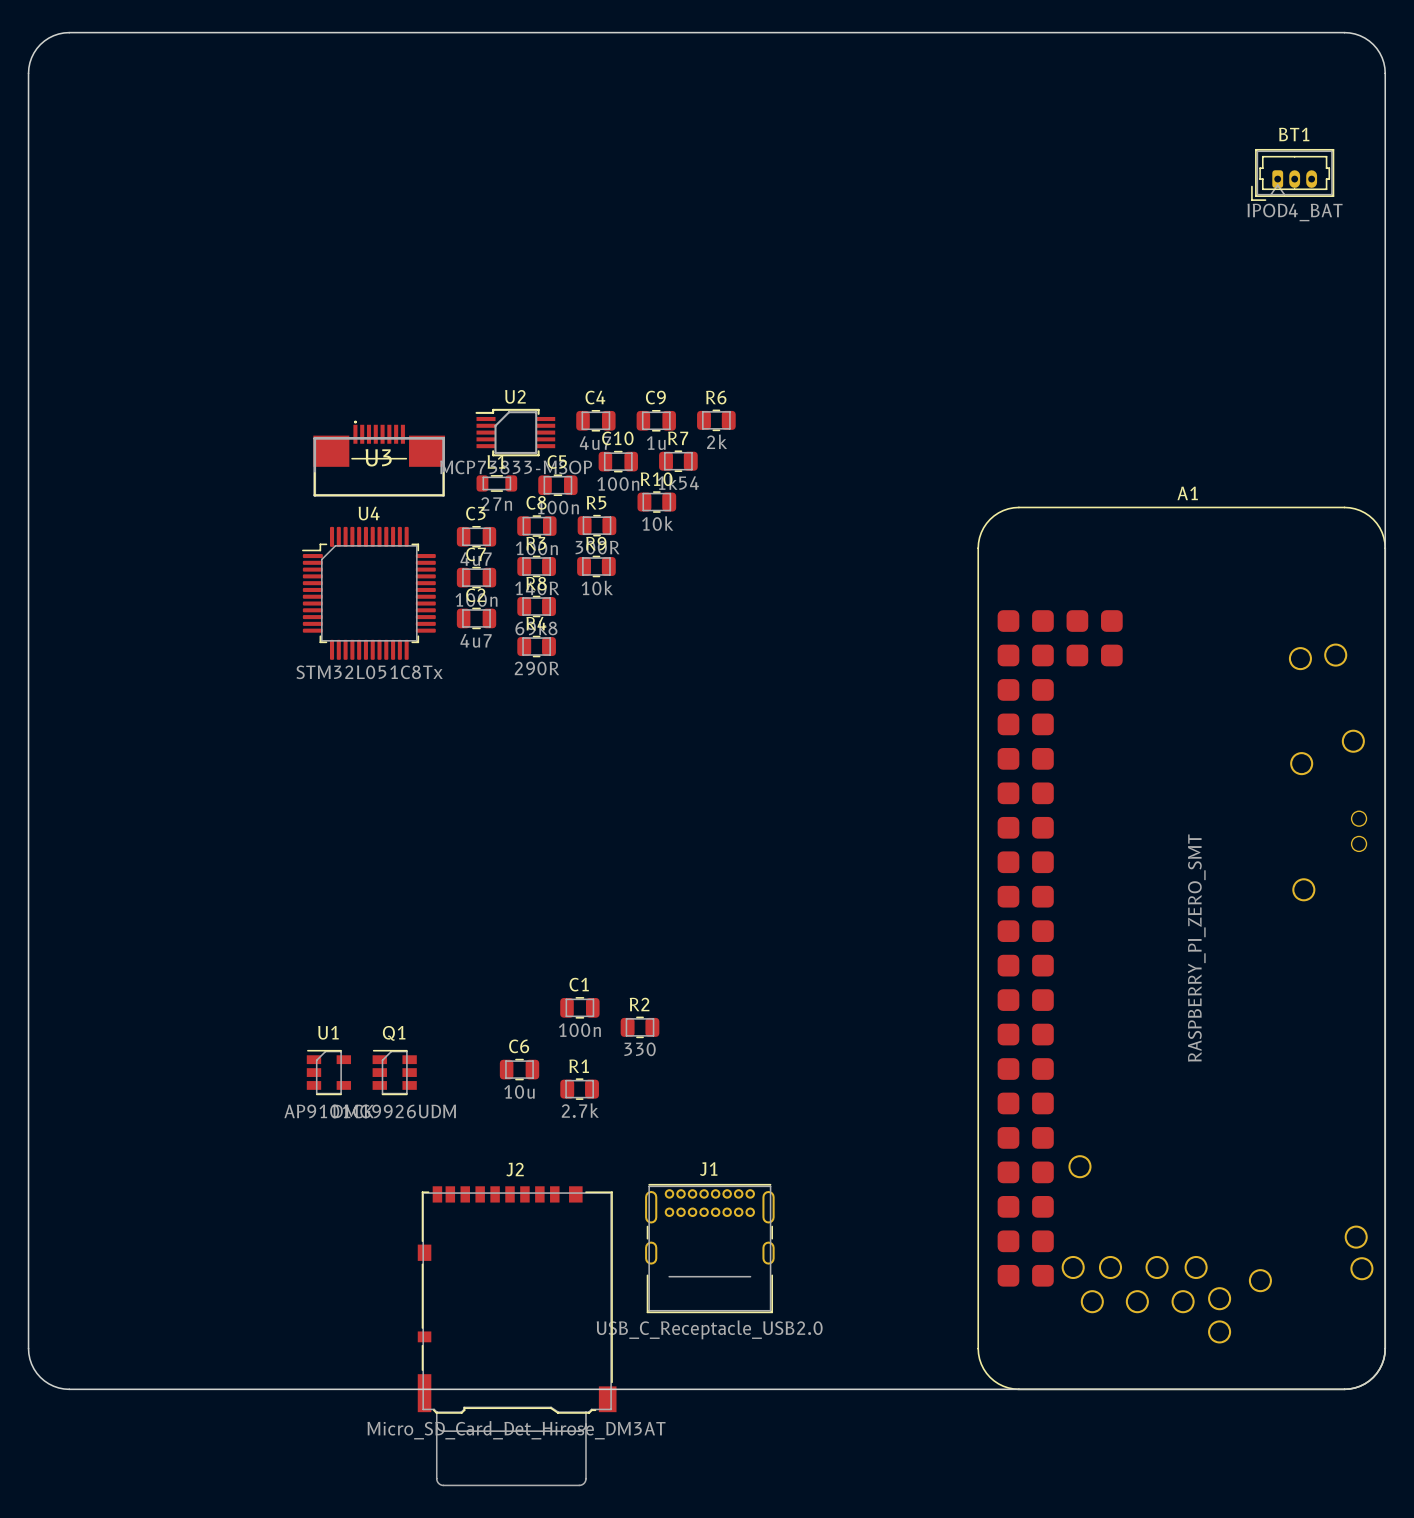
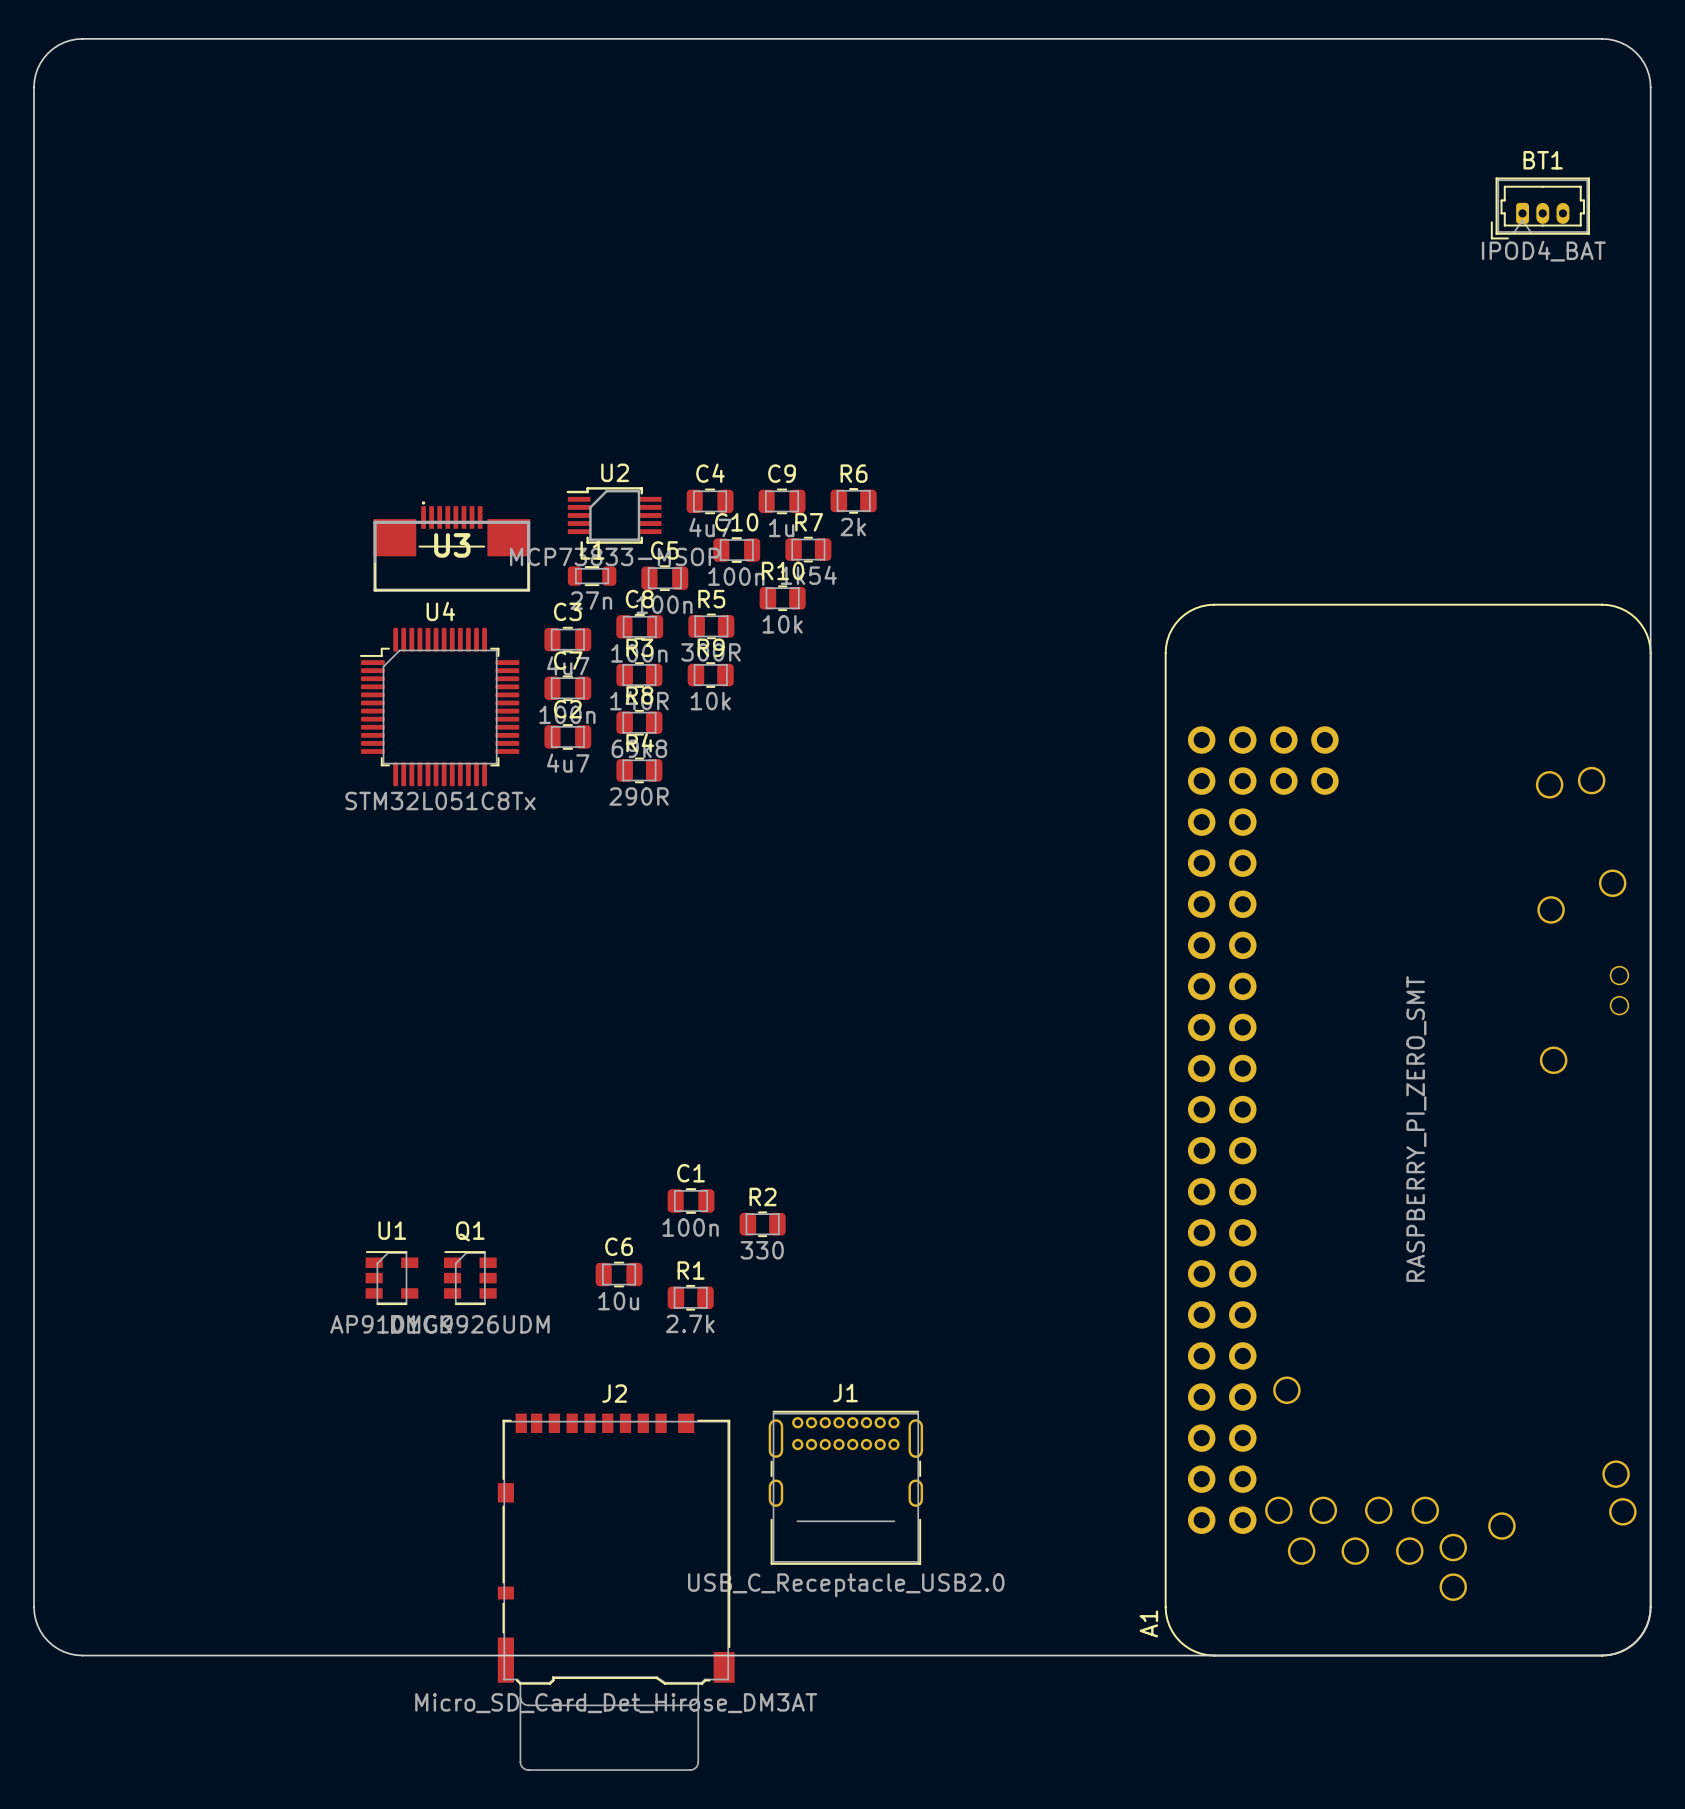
A1 name position: A1 (1187, 493) -> A1 (1148, 1623)
A1 footprint: [977, 506, 1387, 1391] -> [1164, 603, 1652, 1657]

